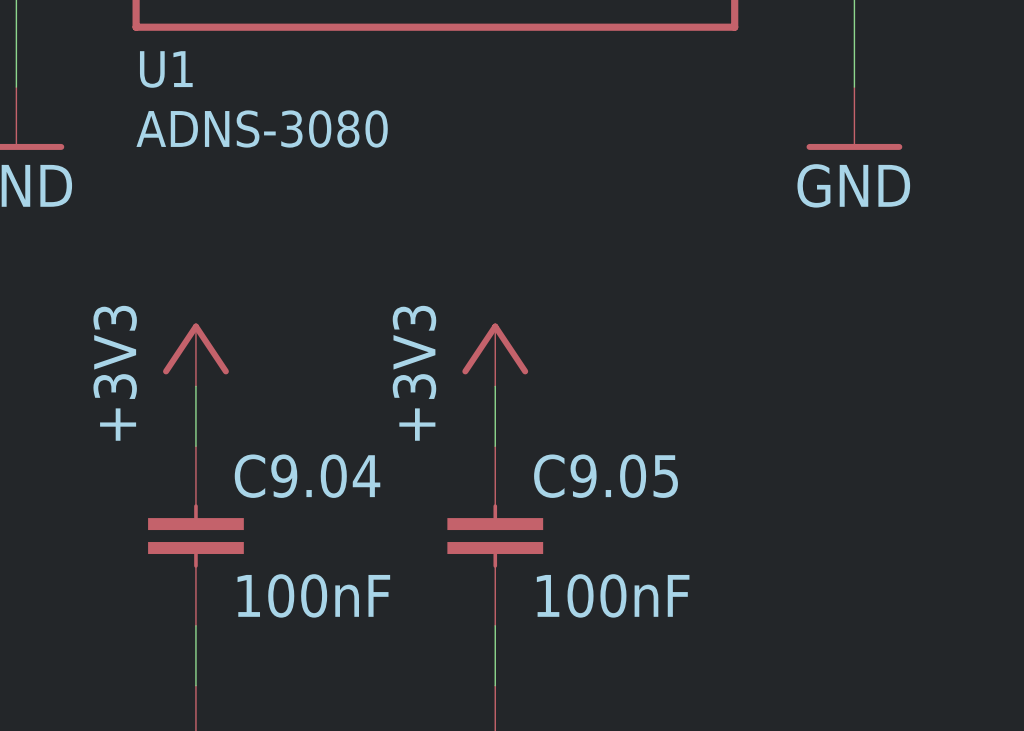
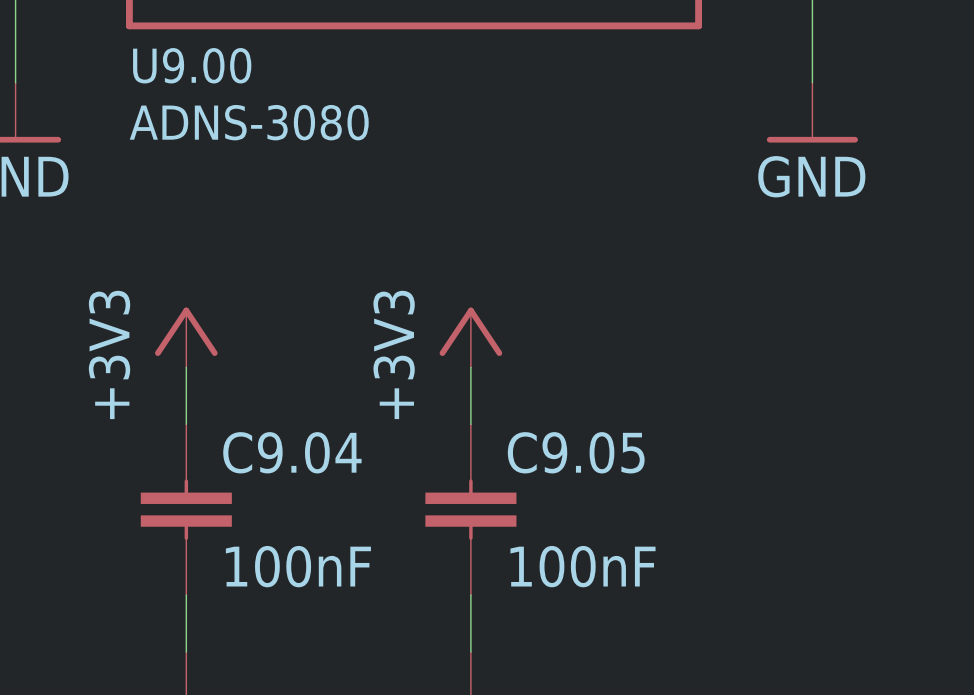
U1 name: U1 (166, 69) -> U9.00 (192, 65)

